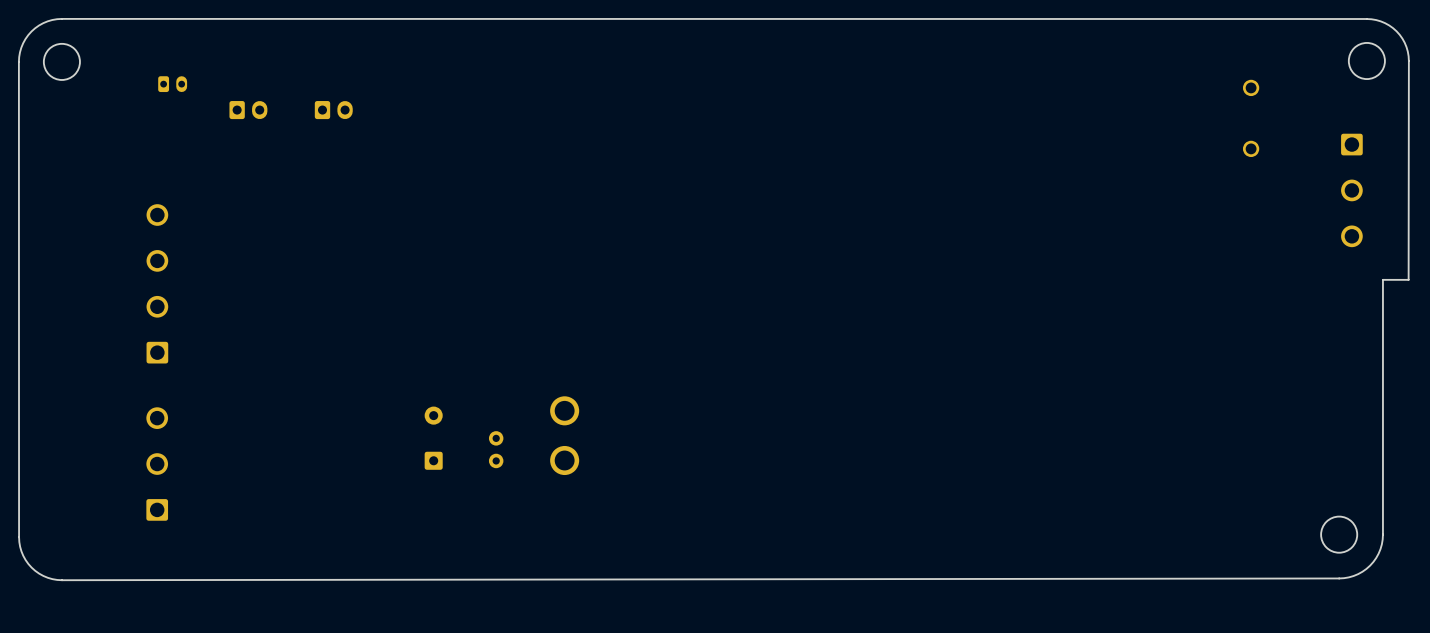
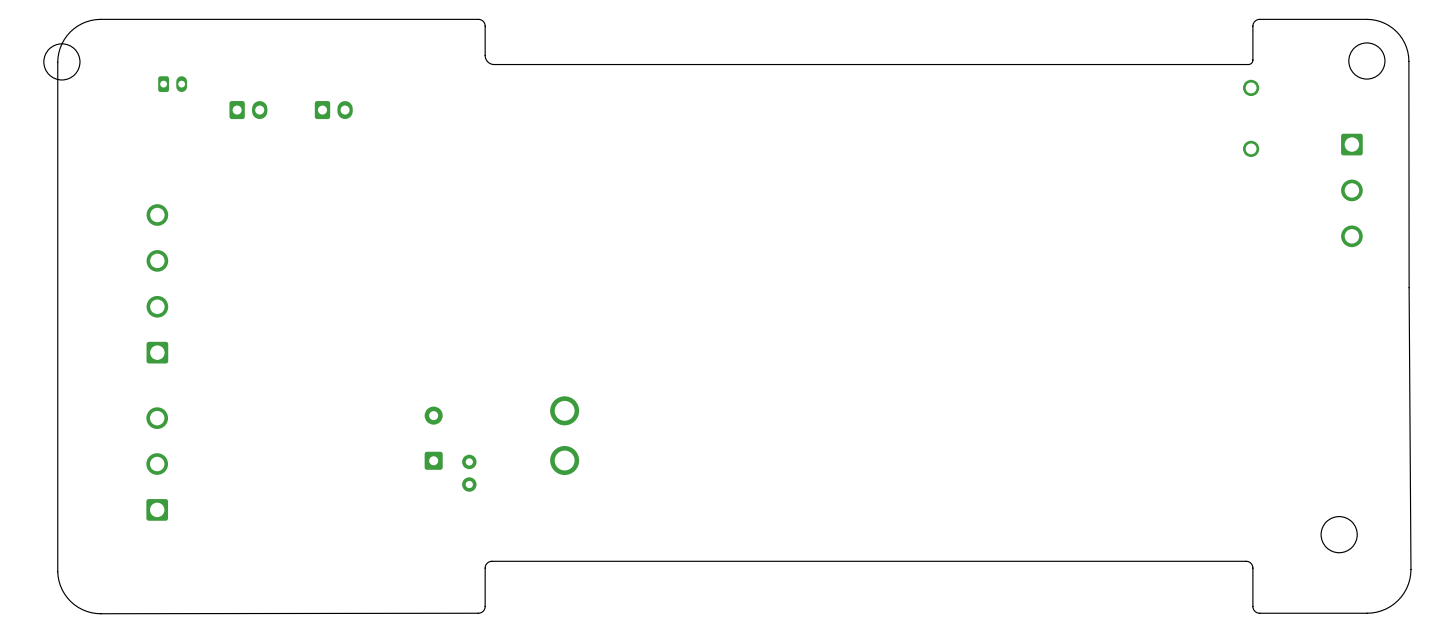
board edge: (61, 18) (1366, 19) (1380, 21) (1389, 25) (1399, 34) (1406, 47) (1408, 61) (1408, 279) (1382, 279) (1382, 534) (1380, 549) (1373, 561) (1362, 571) (1353, 576) (1339, 578) (62, 580) (47, 577) (35, 570) (25, 560) (20, 546) (19, 537) (18, 61) (21, 47) (31, 31) (47, 21) (61, 18) -> (1366, 19) (1380, 21) (1396, 31) (1404, 43) (1408, 61) (1410, 569) (1408, 583) (1404, 592) (1398, 600) (1386, 608) (1367, 613) (1257, 612) (1252, 607) (1252, 566) (1246, 561) (491, 561) (485, 567) (484, 608) (478, 613) (95, 613) (82, 609) (74, 604) (62, 590) (57, 571) (57, 62) (58, 52) (64, 39) (73, 28) (82, 23) (100, 19) (479, 19) (485, 25) (485, 58) (489, 63) (494, 64) (1248, 64) (1252, 60) (1252, 25) (1257, 19) (1366, 19)
part position: (496, 449) -> (469, 473)

